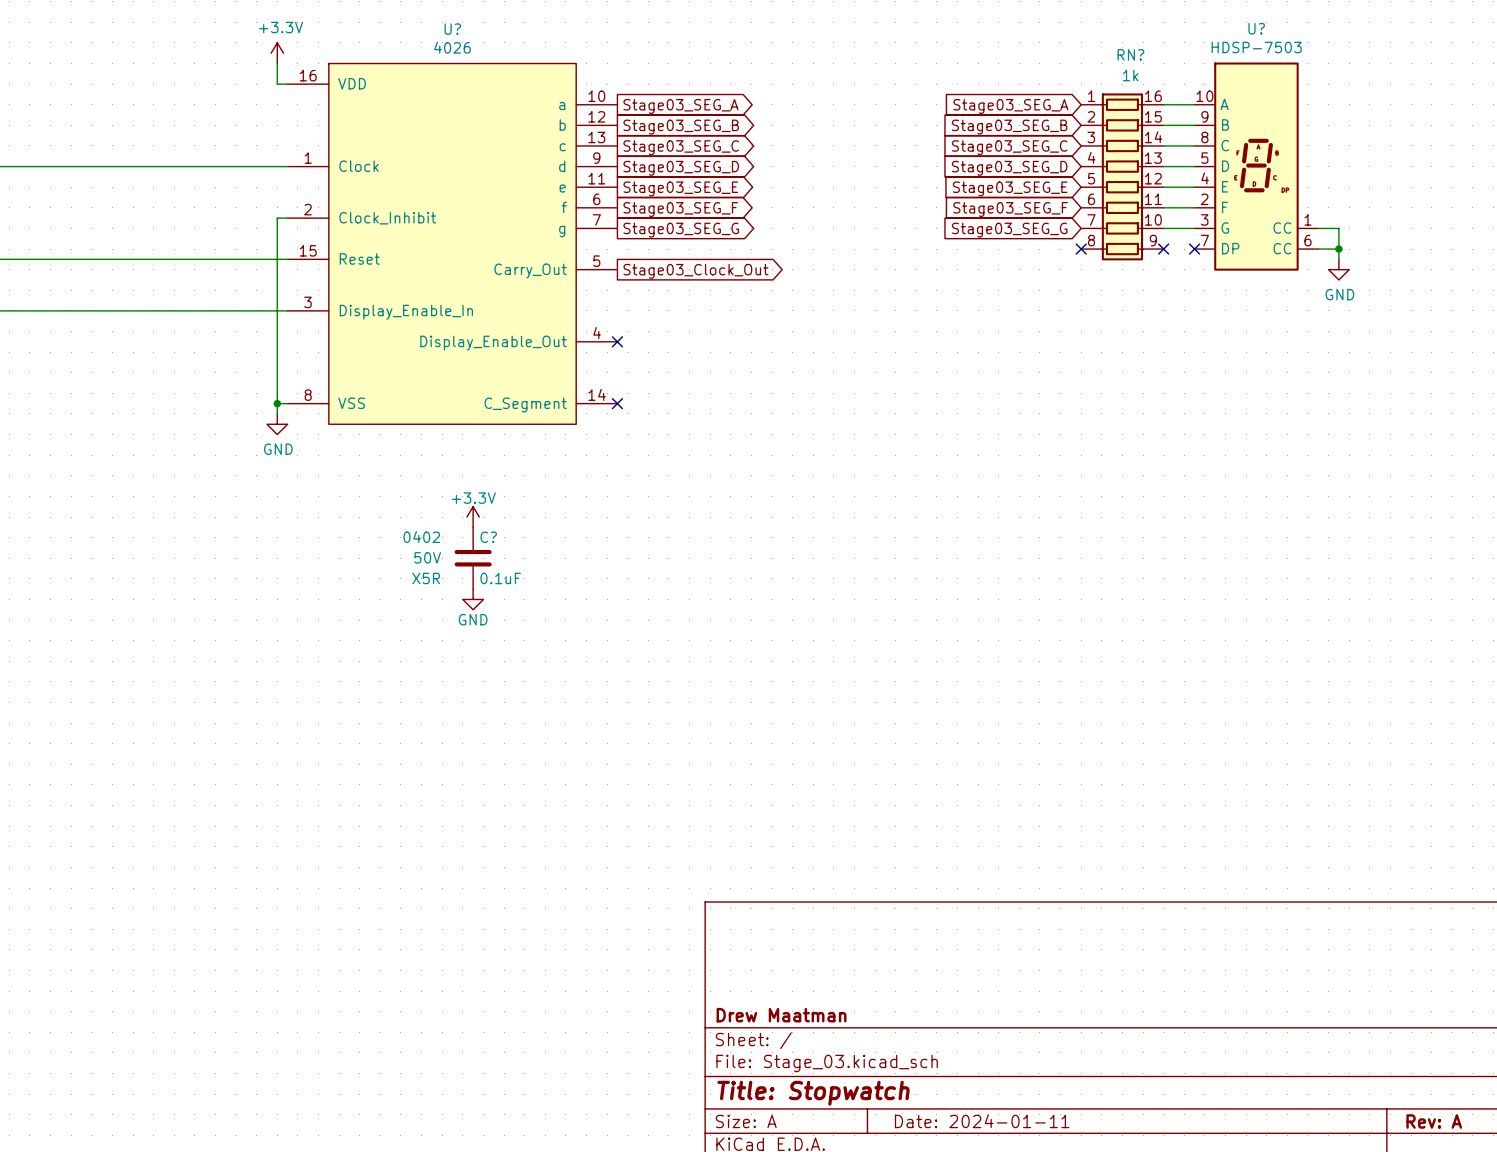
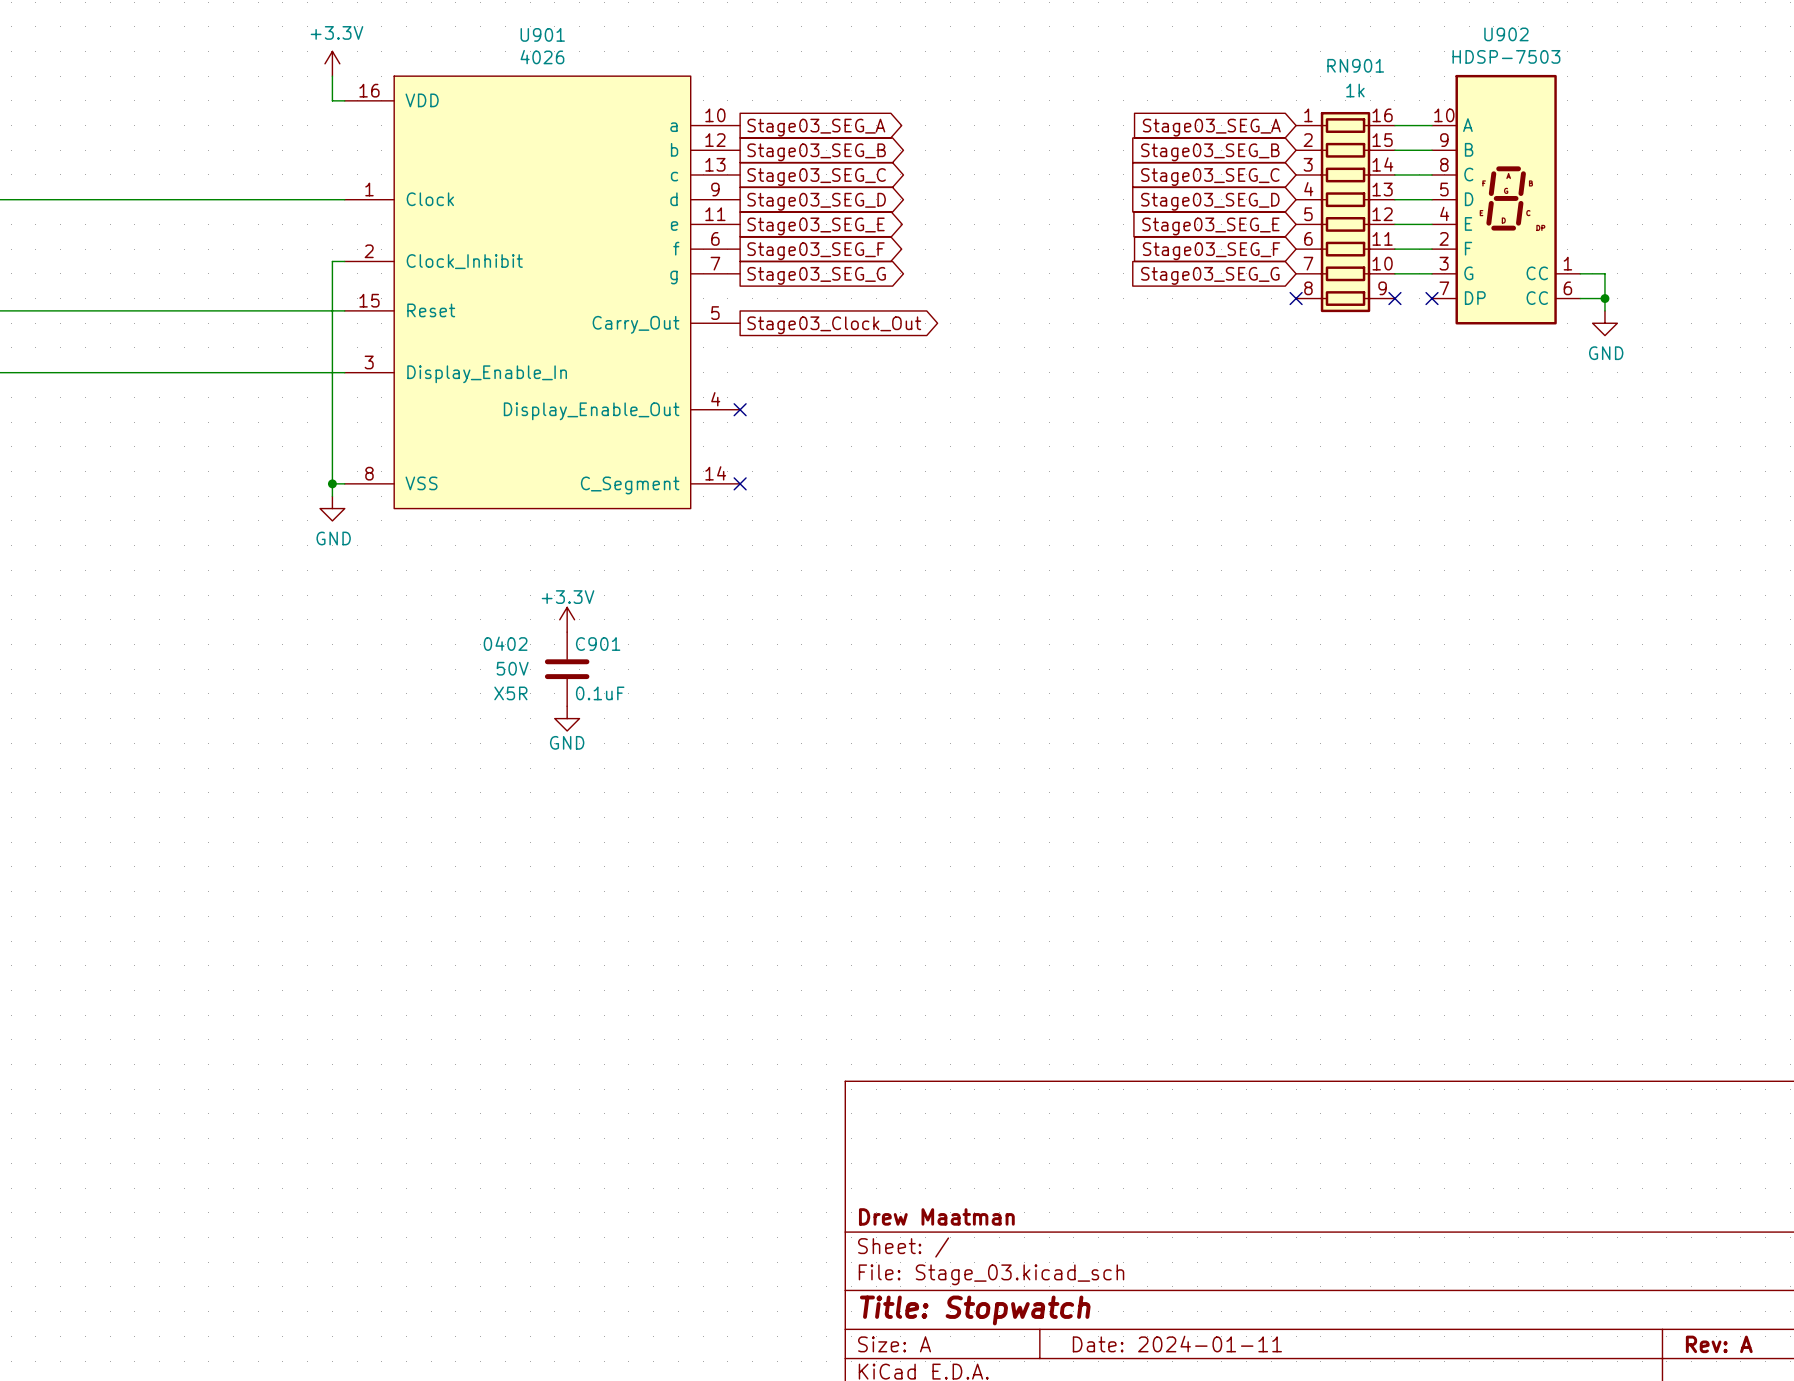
U? name: U? (1256, 28) -> U902 (1506, 34)
U? name: U? (452, 29) -> U901 (542, 34)
RN? name: RN? (1130, 54) -> RN901 (1355, 65)
C? name: C? (488, 537) -> C901 (598, 644)

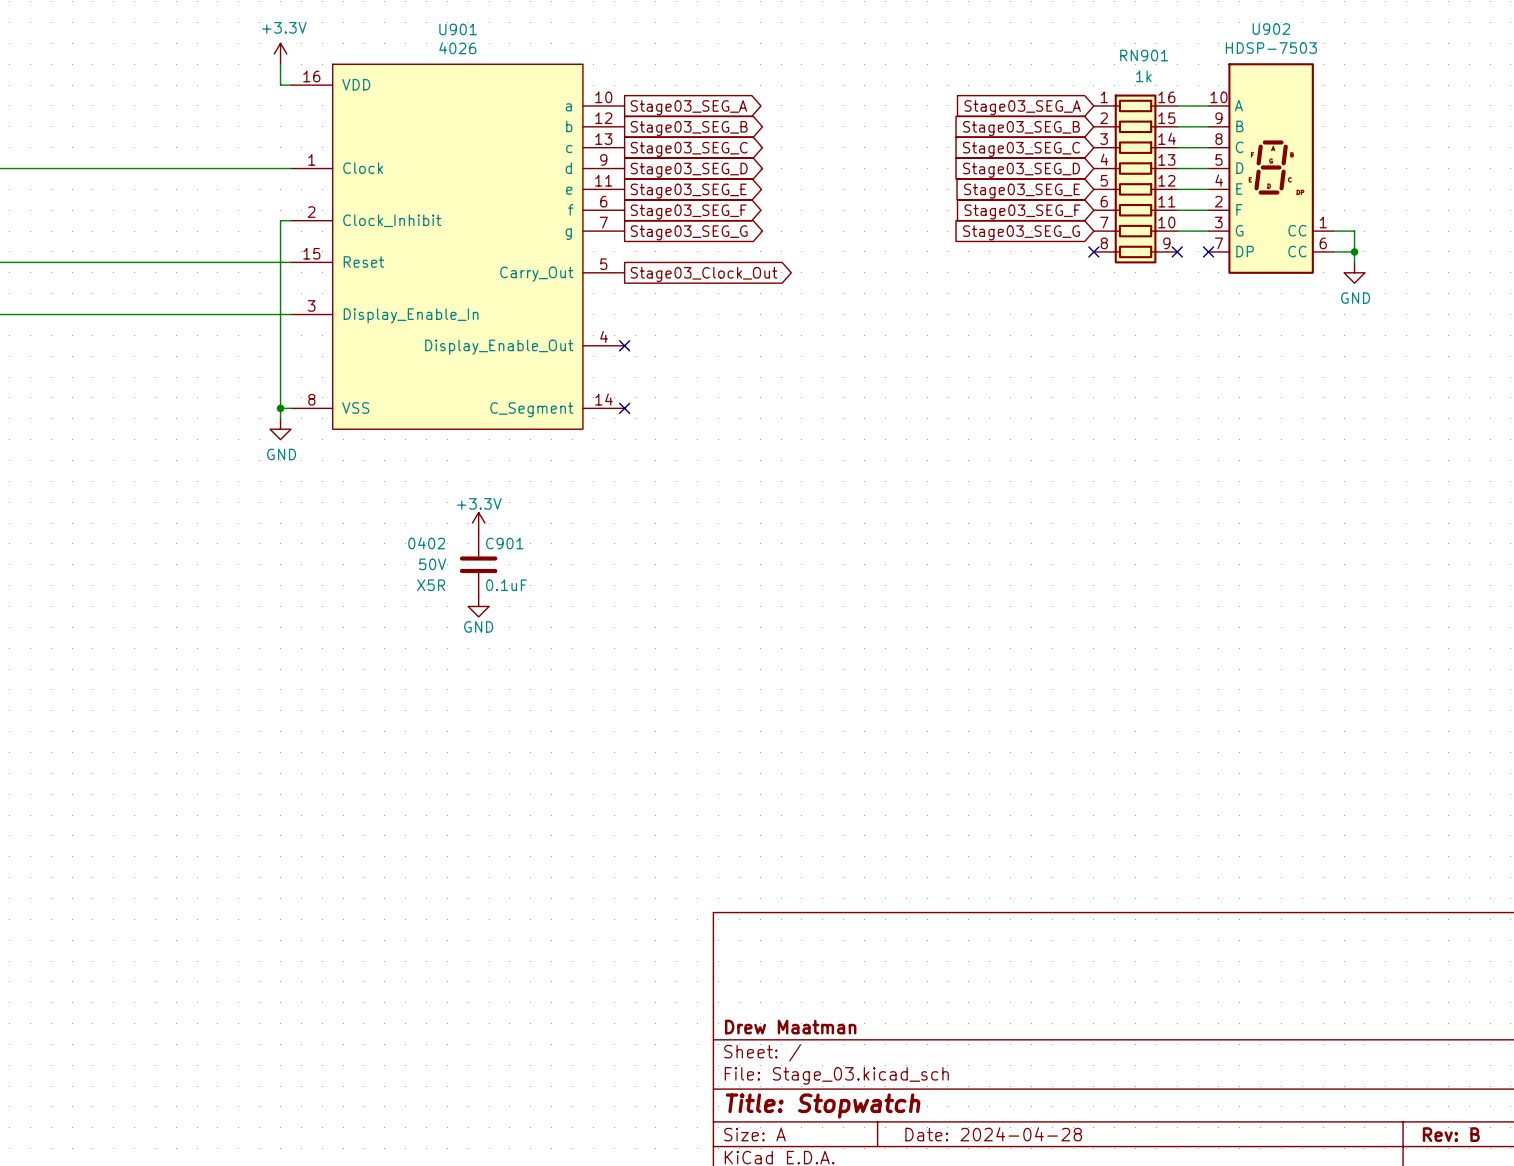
title block: Date: 2024-01-11 (1177, 1344) -> Date: 2024-04-28 (993, 1134)
title block: Rev: A (1719, 1344) -> Rev: B (1451, 1134)

